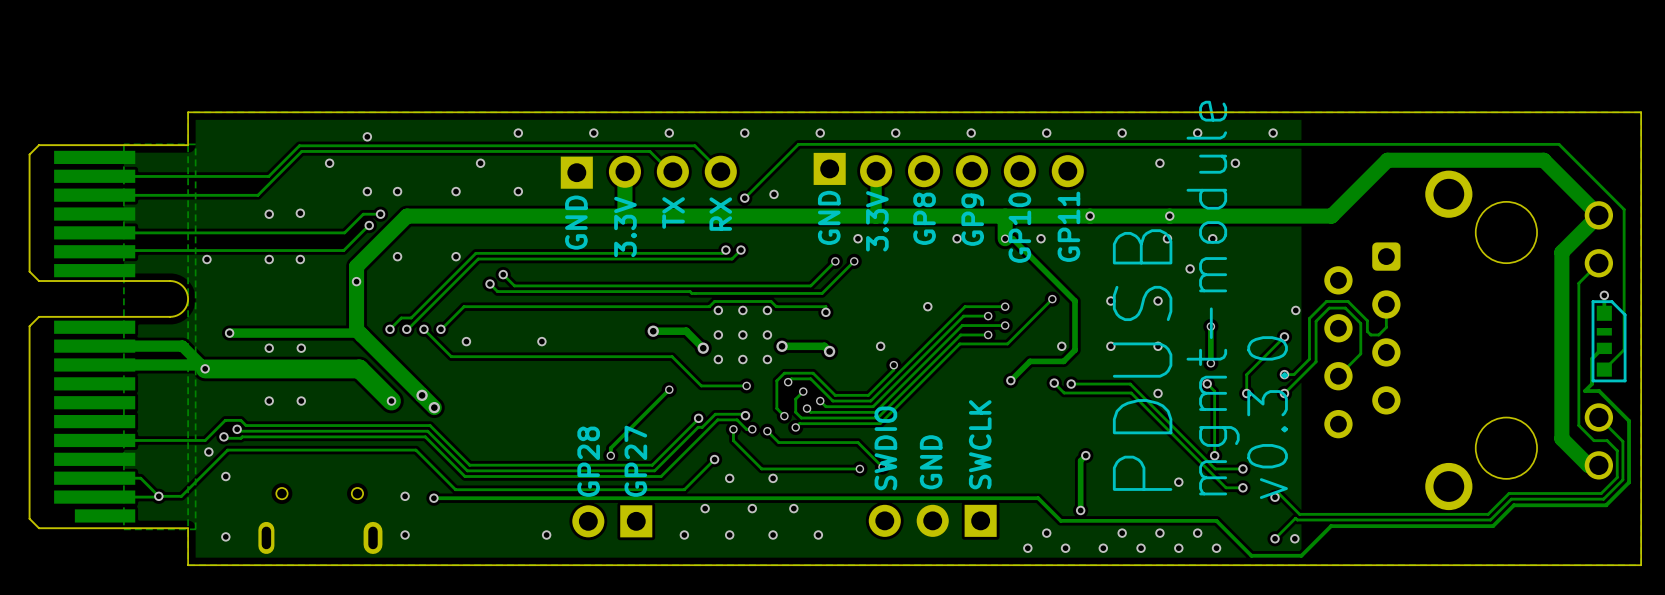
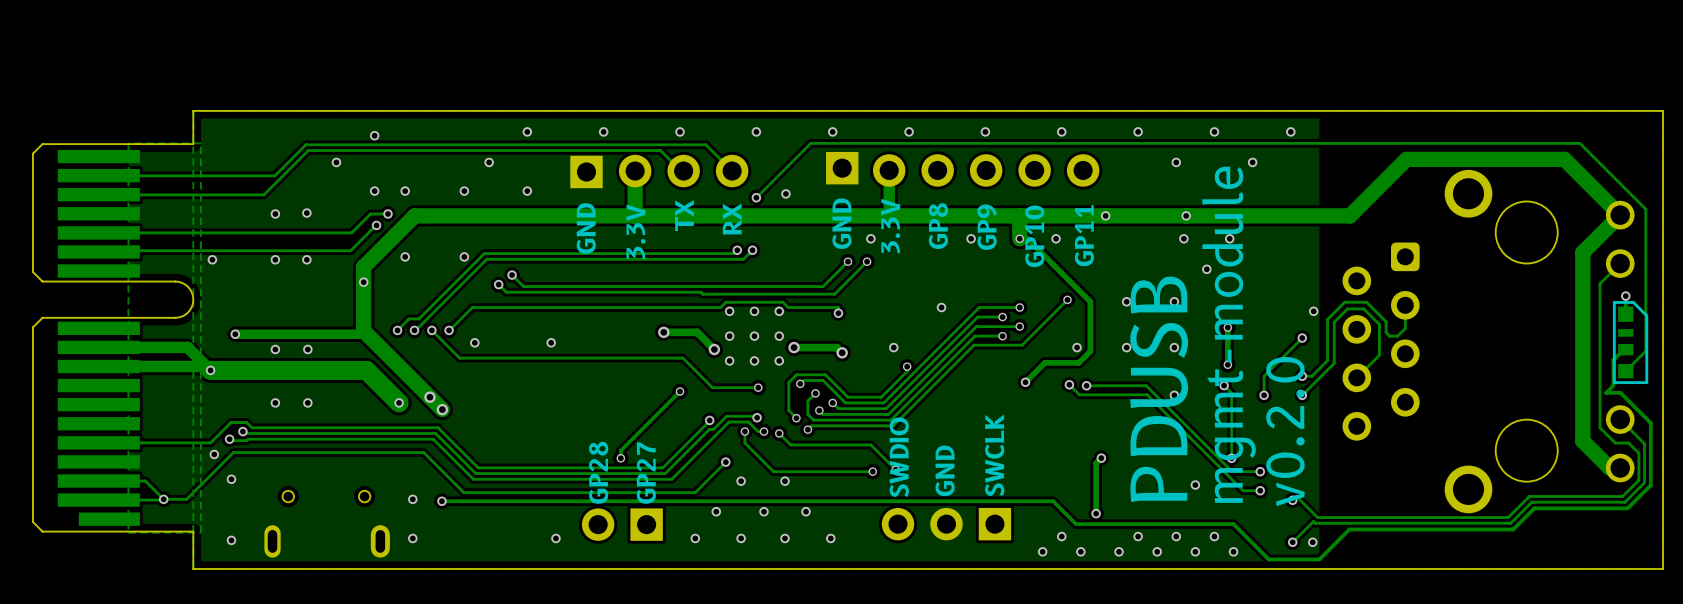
text: v0.3.0 (1267, 417) -> v0.2.0 (1285, 431)

